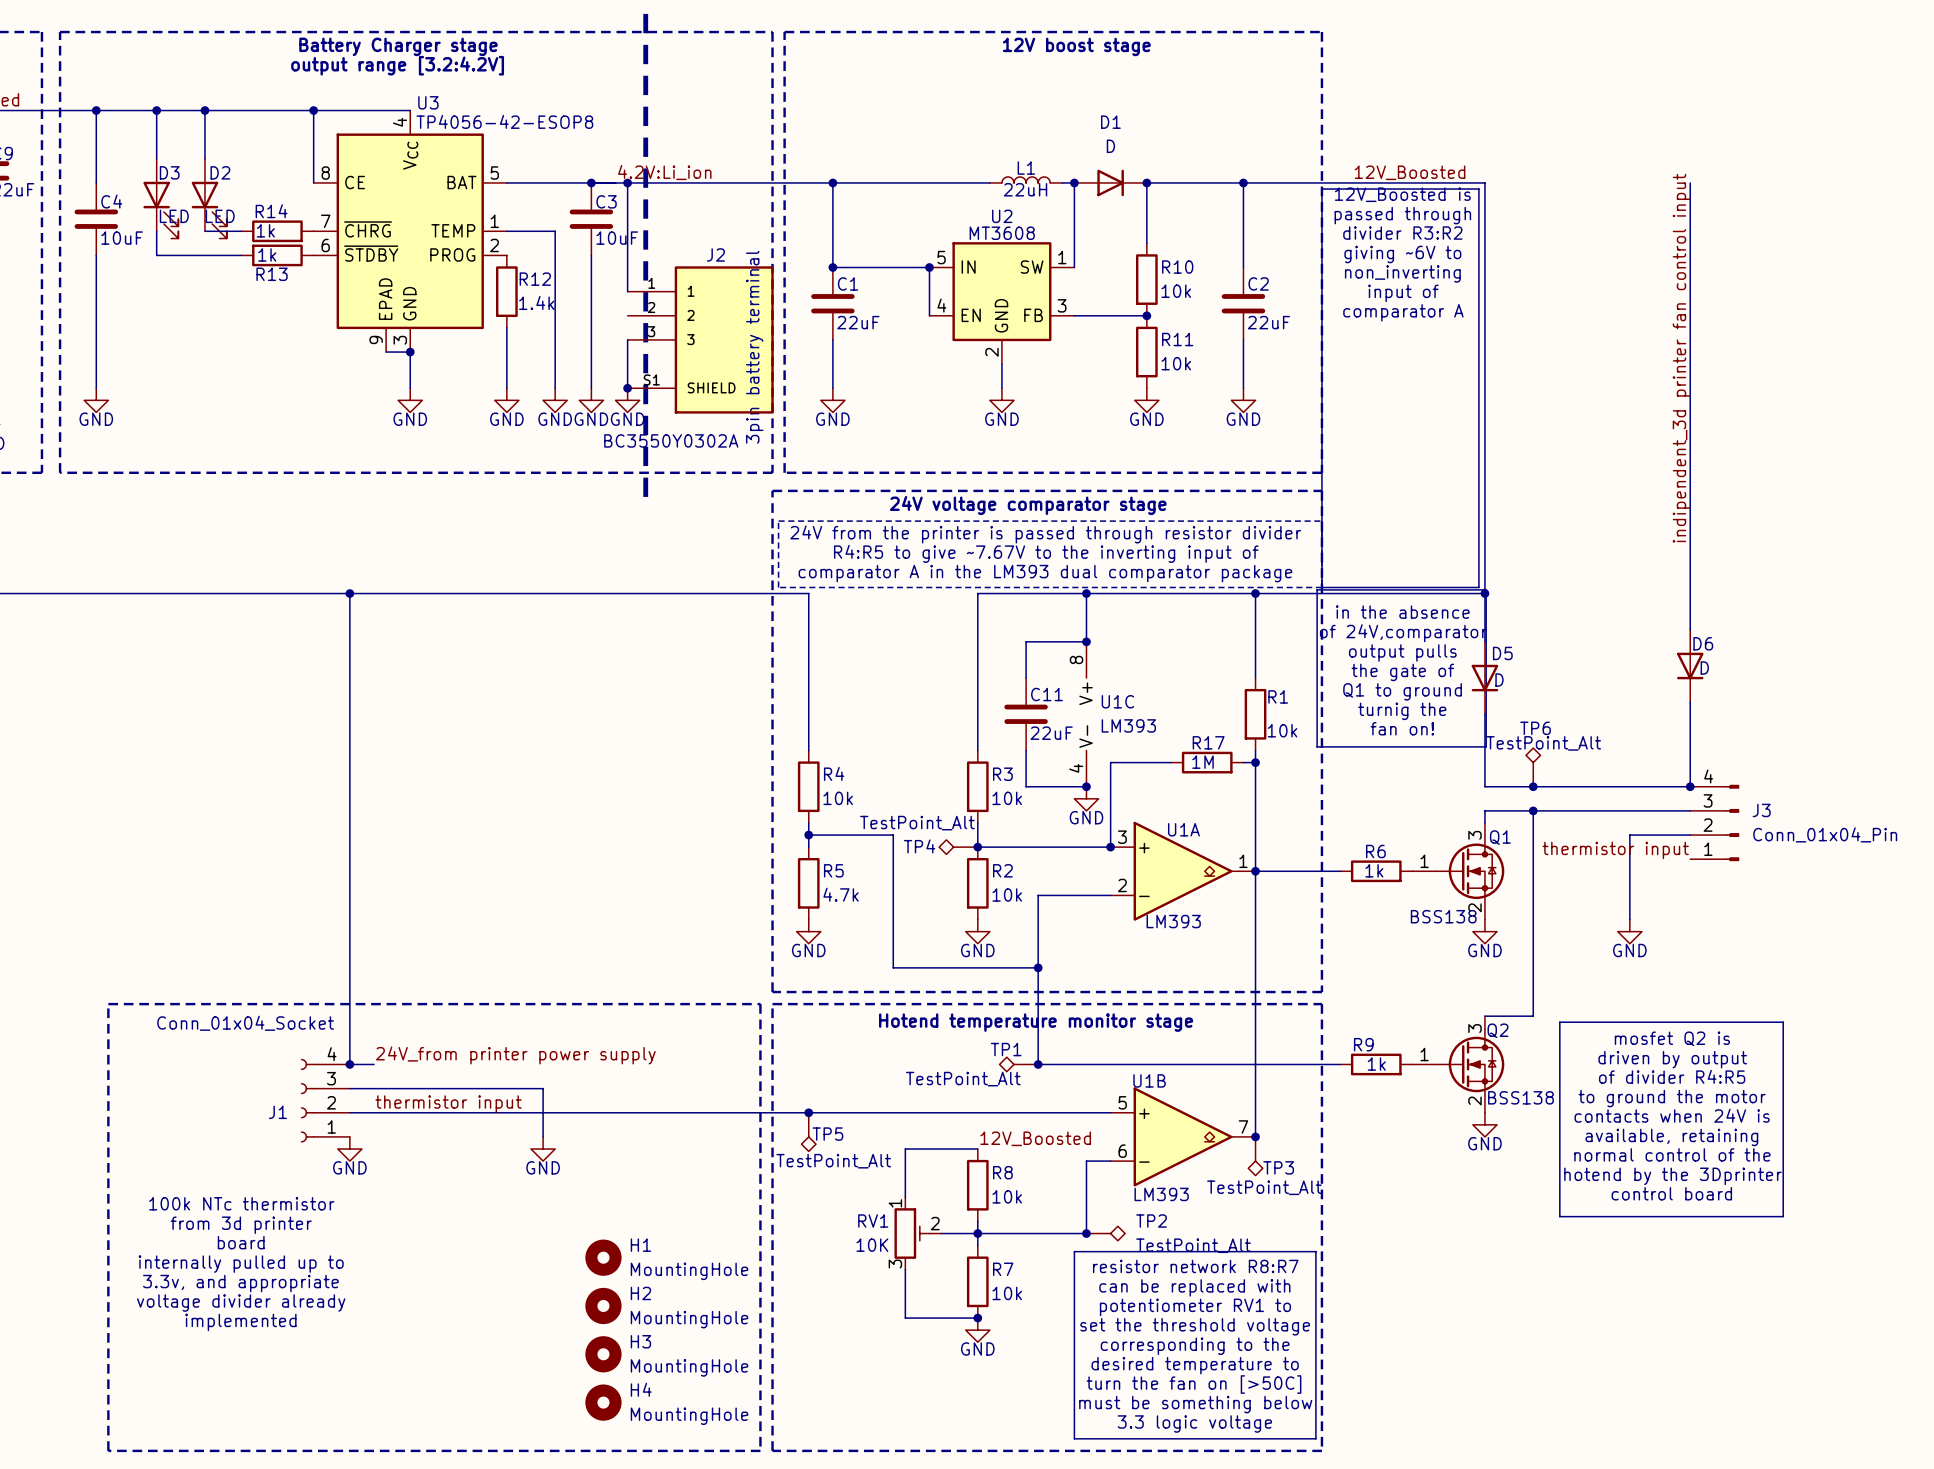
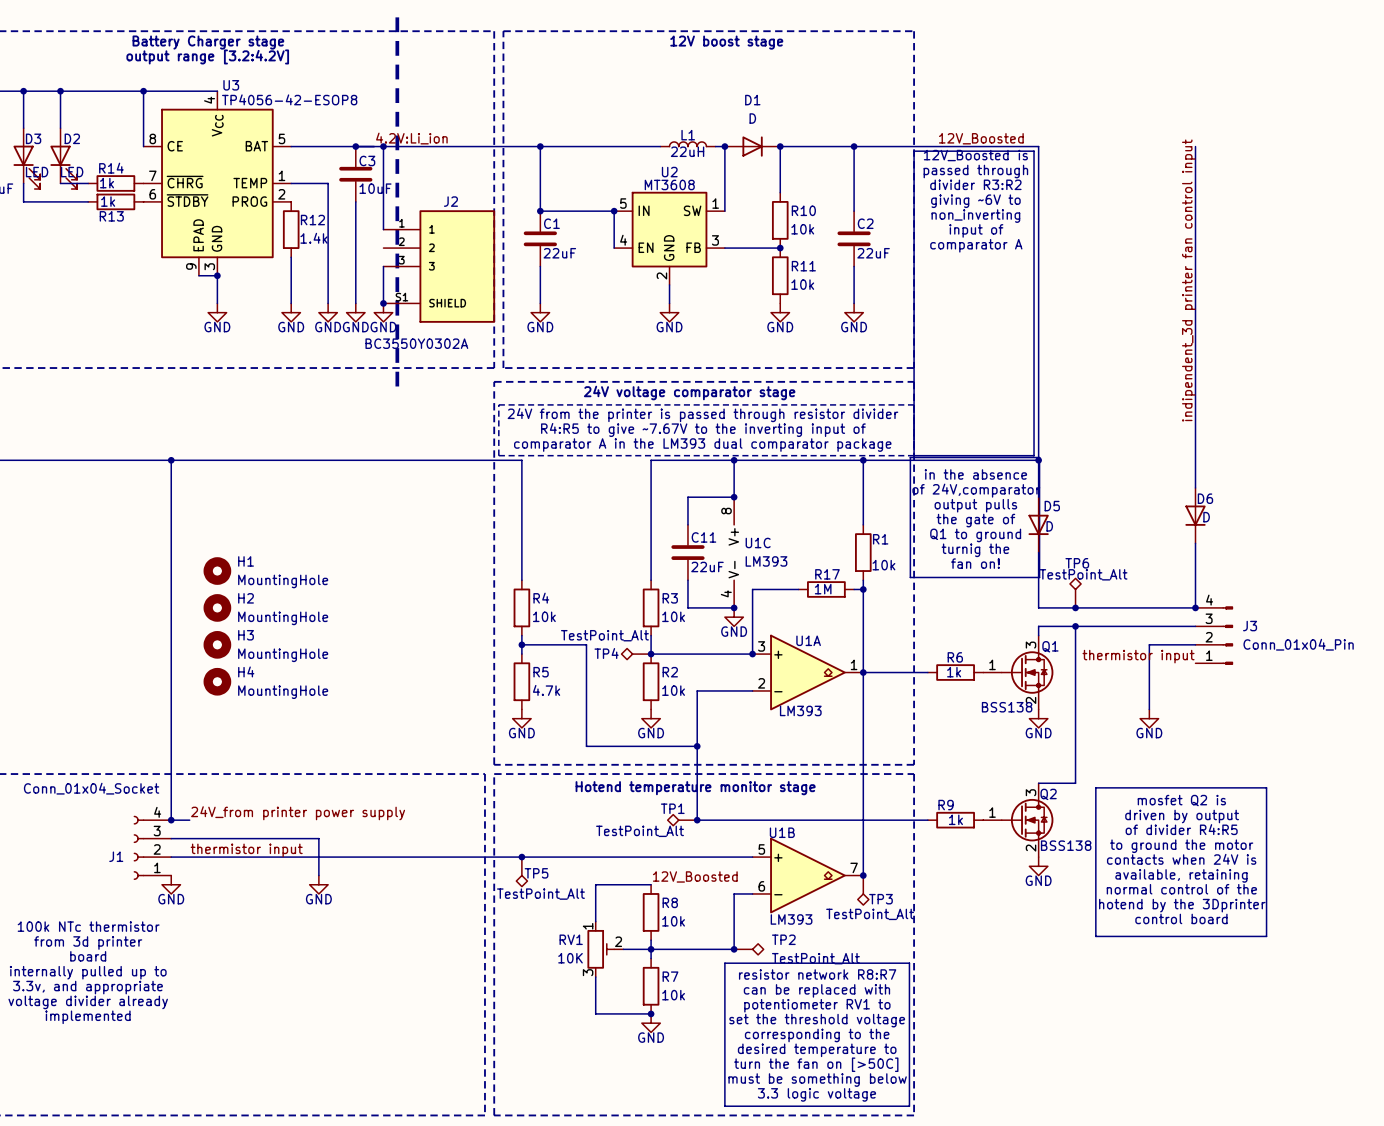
text: 3pin battery terminal (754, 347) -> none
H1 position: (603, 1257) -> (217, 571)
H2 position: (603, 1305) -> (217, 607)
H3 position: (603, 1354) -> (217, 644)
H4 position: (603, 1402) -> (217, 681)

